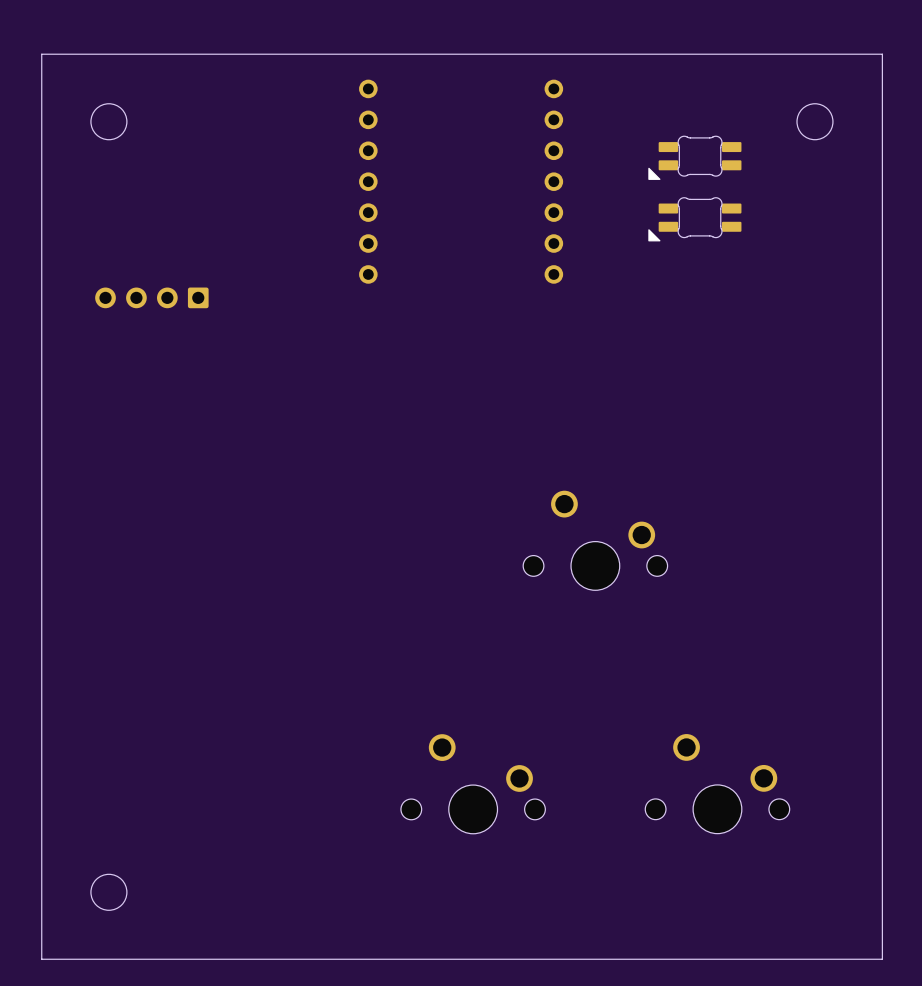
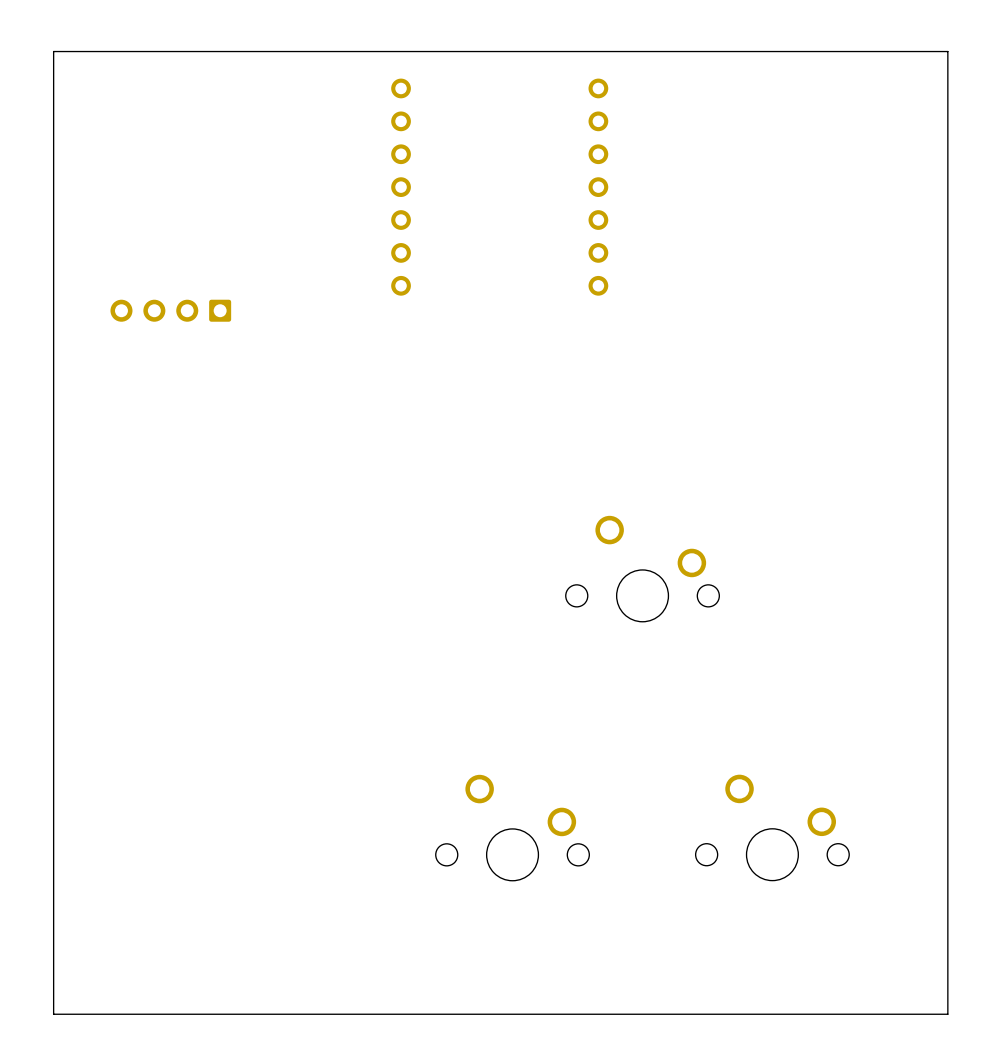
round board edge: [90, 103, 128, 141] -> none
round board edge: [796, 103, 834, 141] -> none
part: (694, 157) -> none
part: (694, 219) -> none
round board edge: [90, 874, 128, 911] -> none

